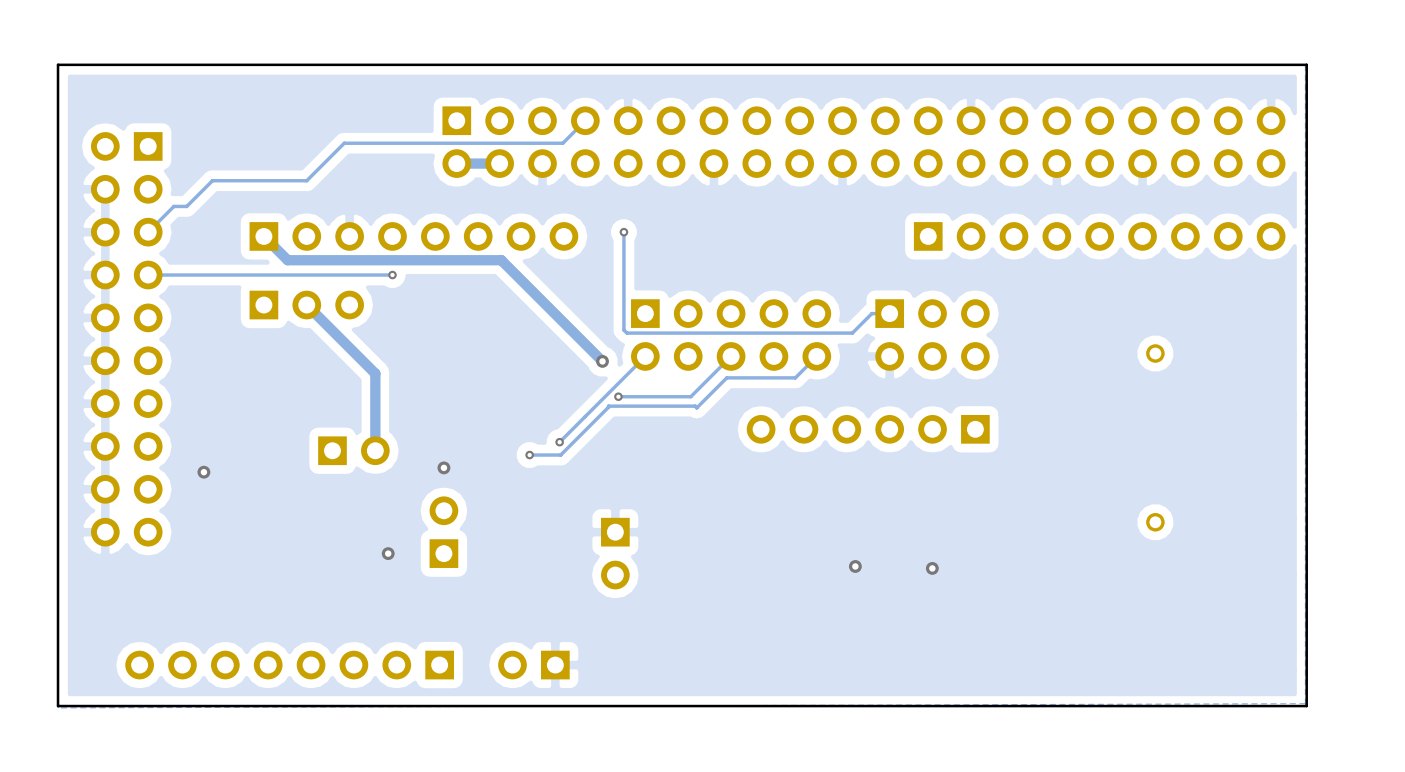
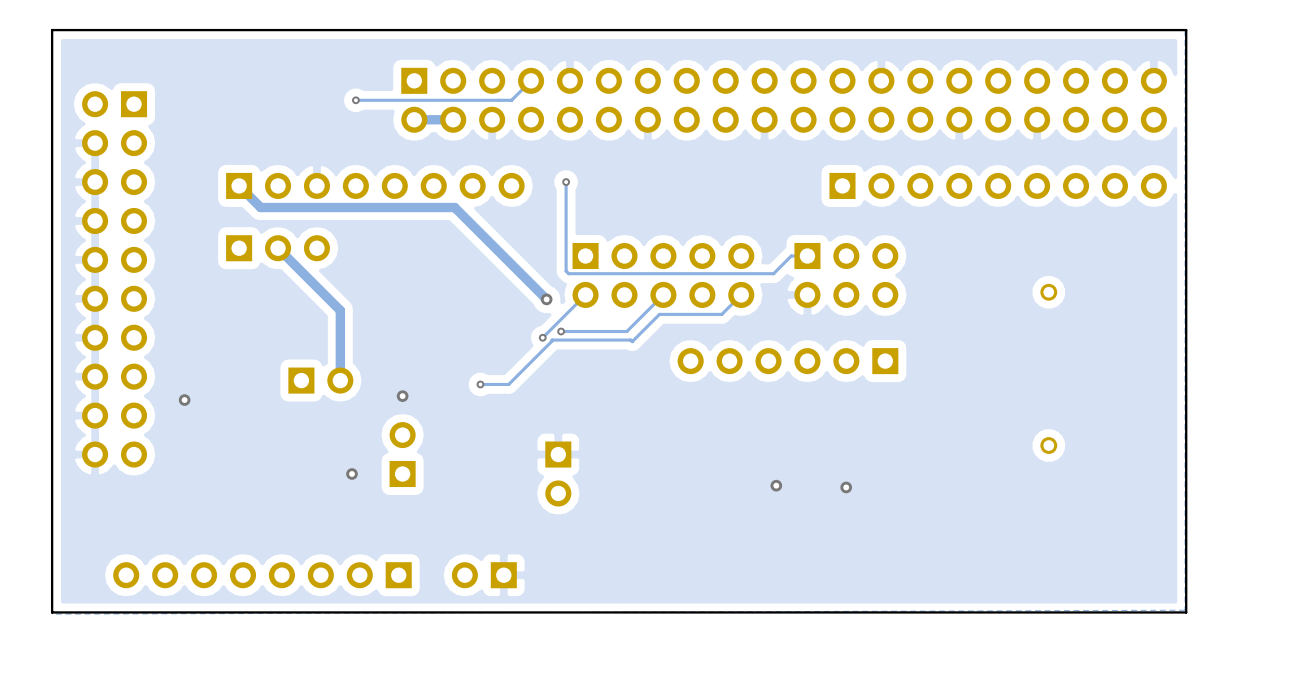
via: none -> (355, 100)
track: (563, 142) (344, 143) (306, 180) (212, 180) (186, 206) (173, 206) (148, 232) -> (511, 100) (355, 100)
track: (392, 275) (148, 275) -> none
via: (392, 275) -> none
track: (598, 403) (559, 442) -> none
via position: (559, 442) -> (542, 337)

